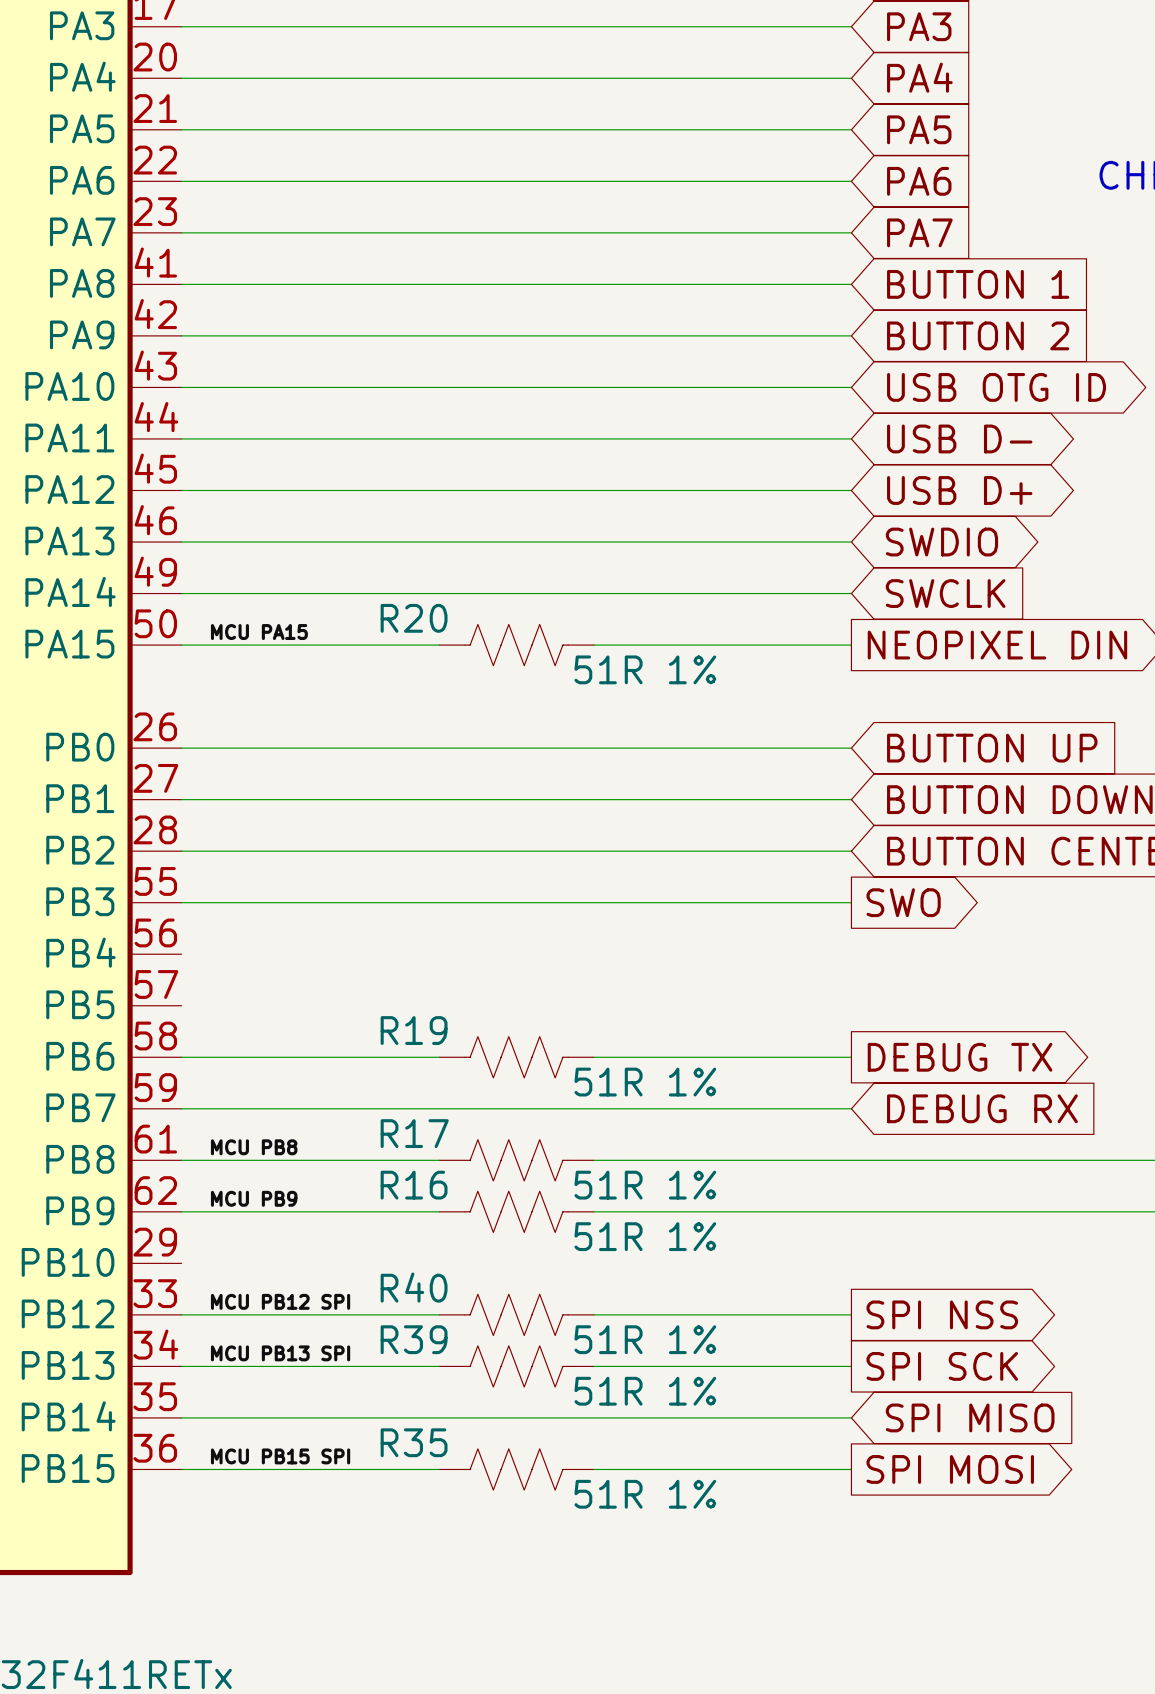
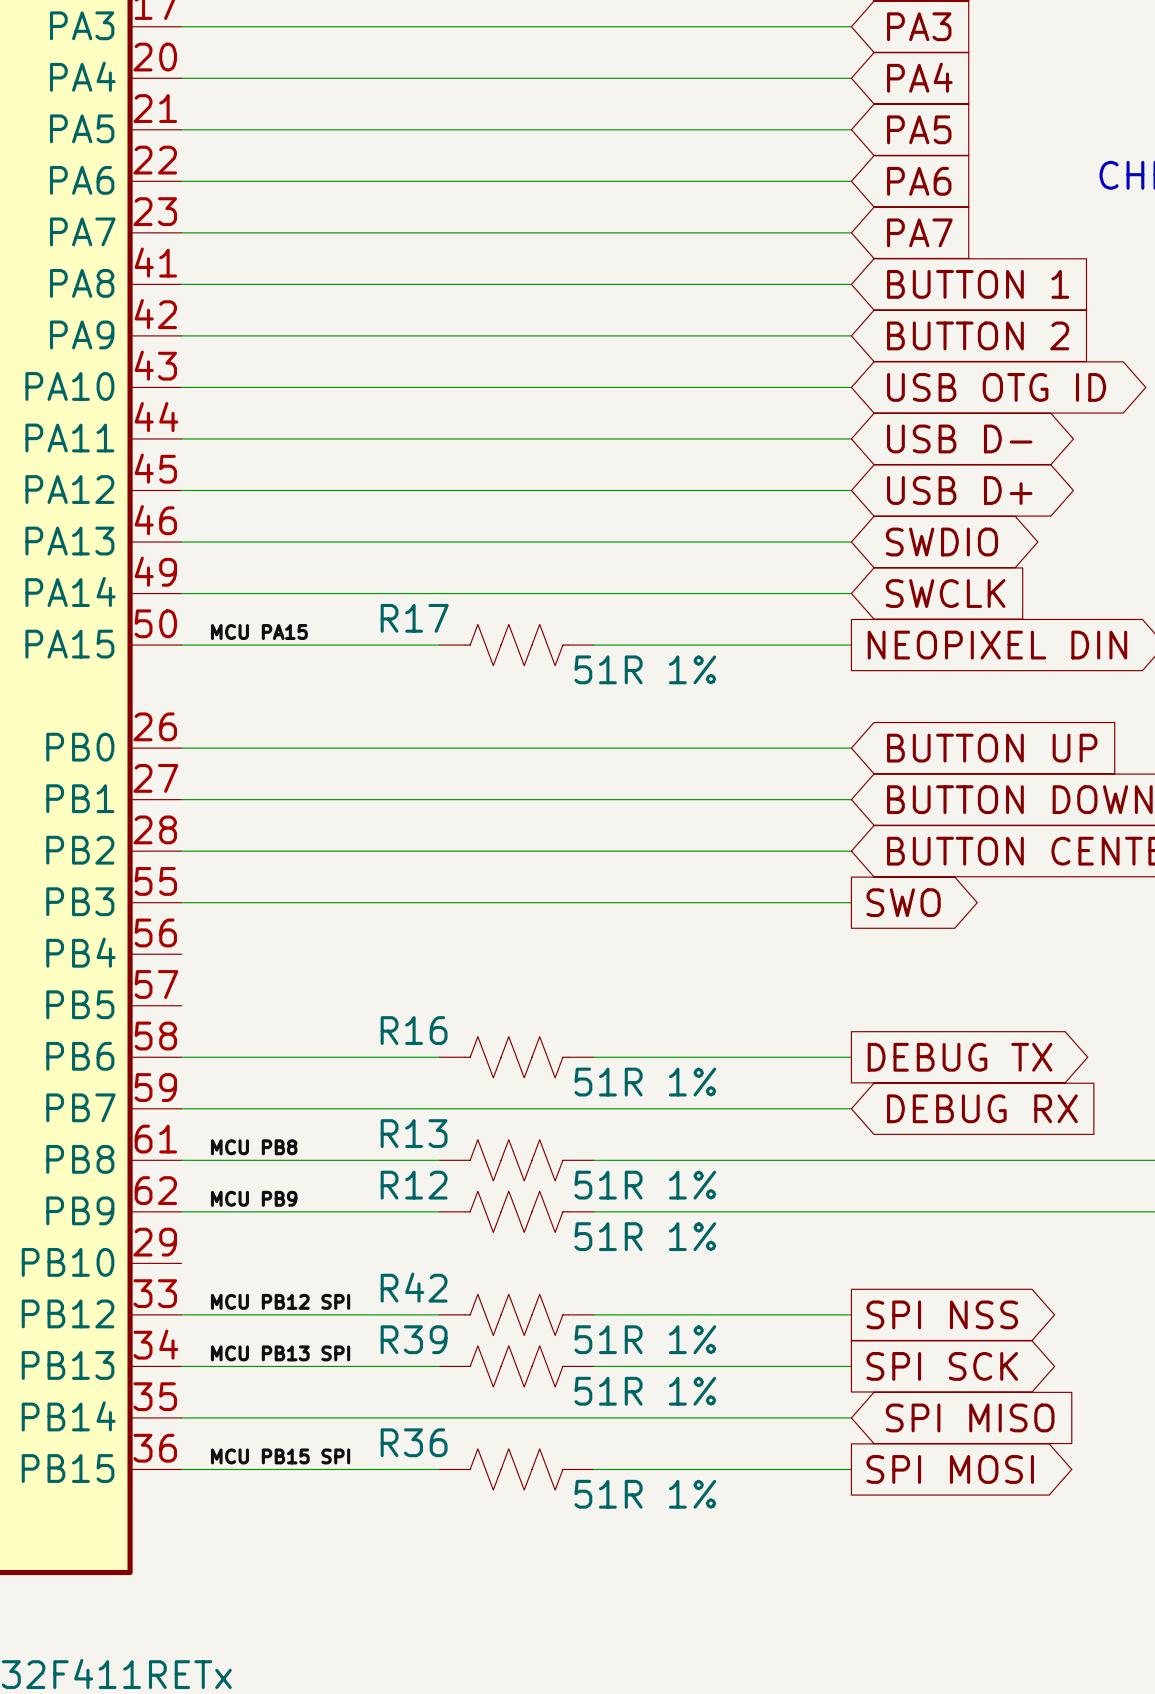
R20 name: R20 (414, 618) -> R17 (414, 618)
R19 name: R19 (414, 1030) -> R16 (414, 1030)
R17 name: R17 (414, 1133) -> R13 (414, 1133)
R16 name: R16 (414, 1185) -> R12 (414, 1185)
R40 name: R40 (414, 1287) -> R42 (414, 1287)
R35 name: R35 (414, 1442) -> R36 (414, 1442)

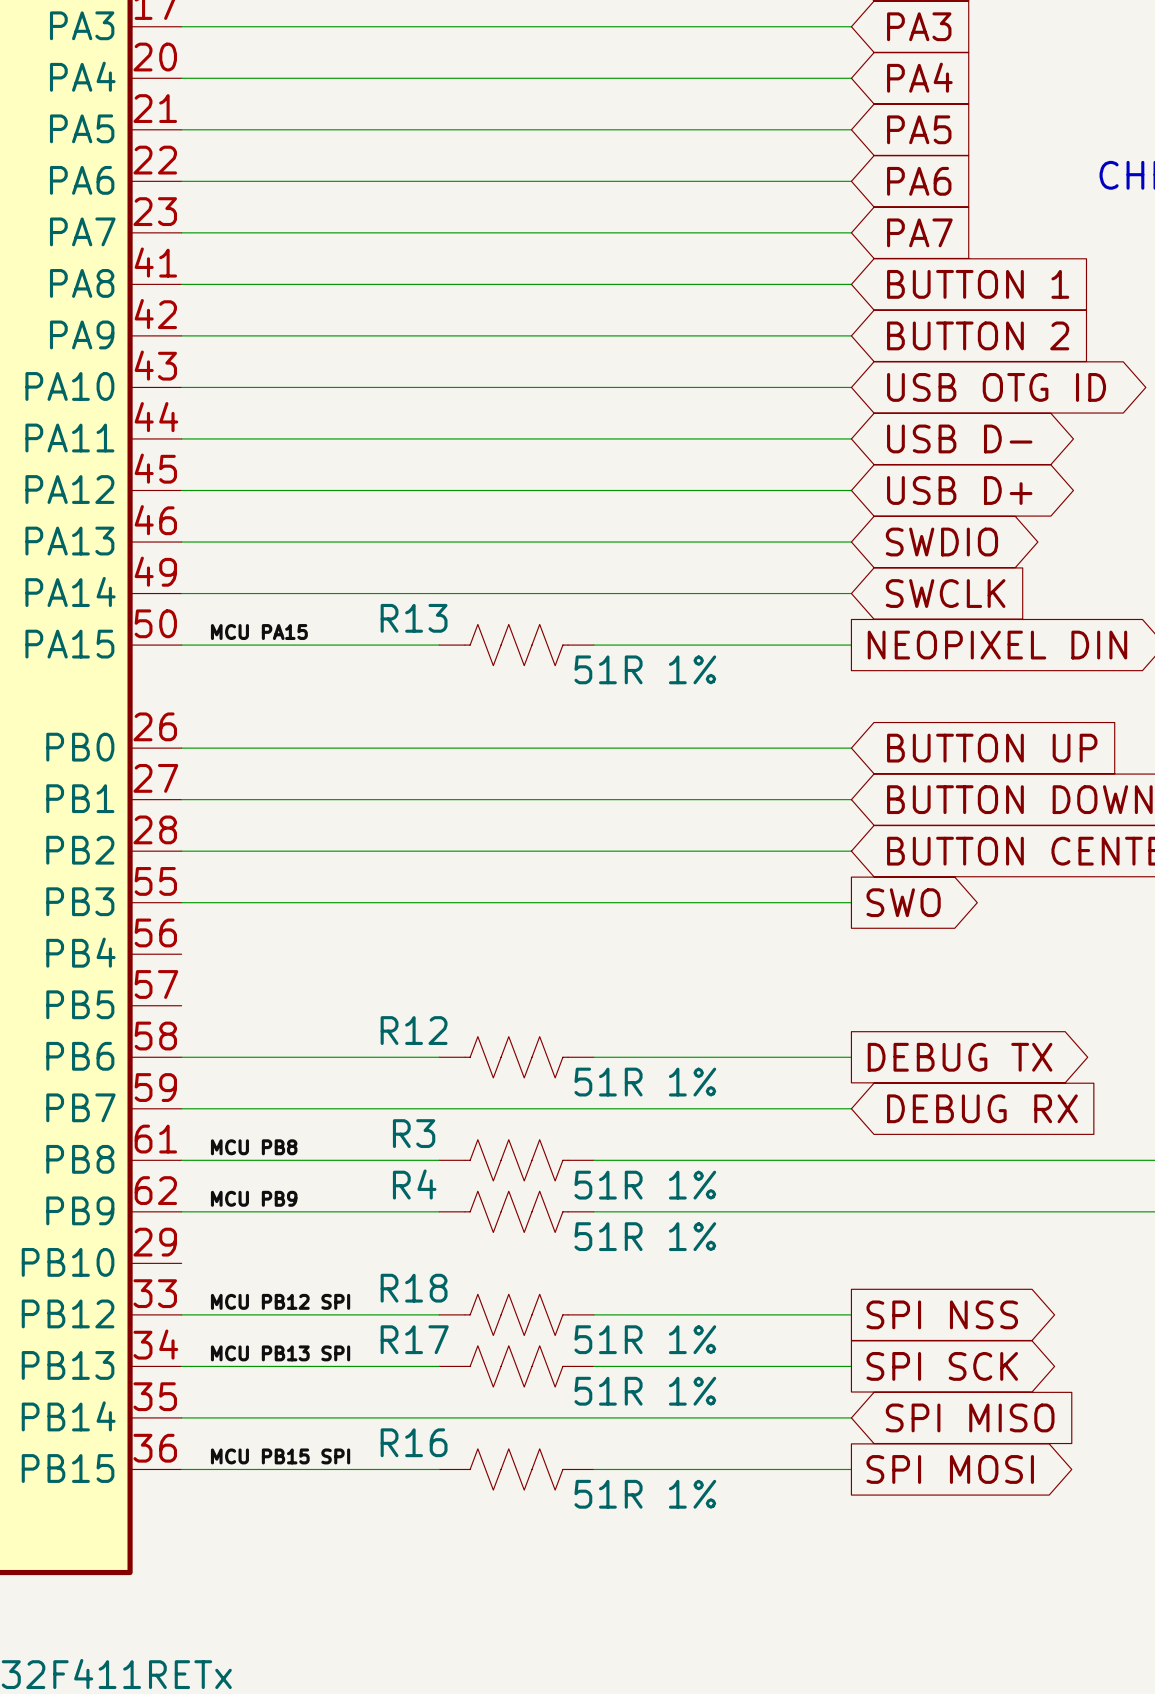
R17 name: R17 (414, 618) -> R13 (414, 618)
R16 name: R16 (414, 1030) -> R12 (414, 1030)
R13 name: R13 (414, 1133) -> R3 (414, 1133)
R12 name: R12 (414, 1185) -> R4 (414, 1184)
R42 name: R42 (414, 1287) -> R18 (414, 1288)
R39 name: R39 (414, 1339) -> R17 (414, 1339)
R36 name: R36 (414, 1442) -> R16 (414, 1442)

